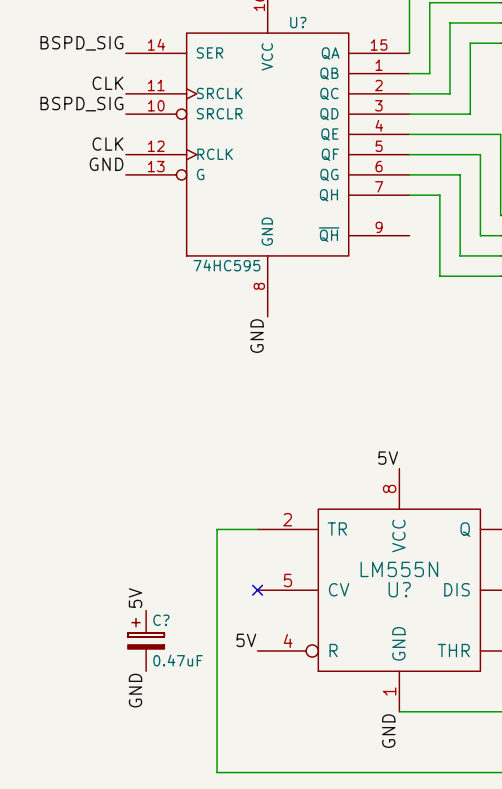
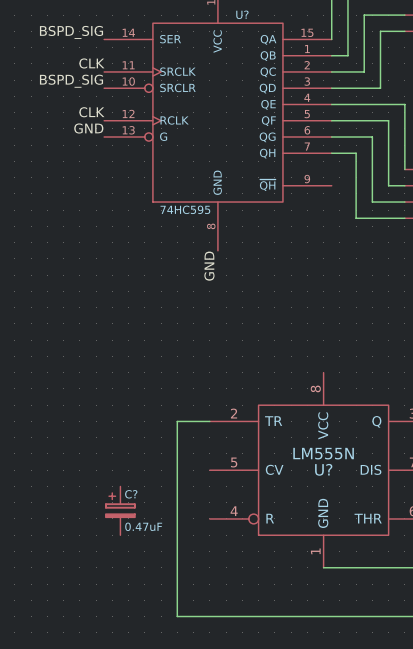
label: 5V (388, 458) -> none
no-connect mark: (257, 590) -> none
label: 5V (135, 598) -> none
label: 5V (246, 640) -> none
label: GND (135, 690) -> none
label: GND (388, 731) -> none

